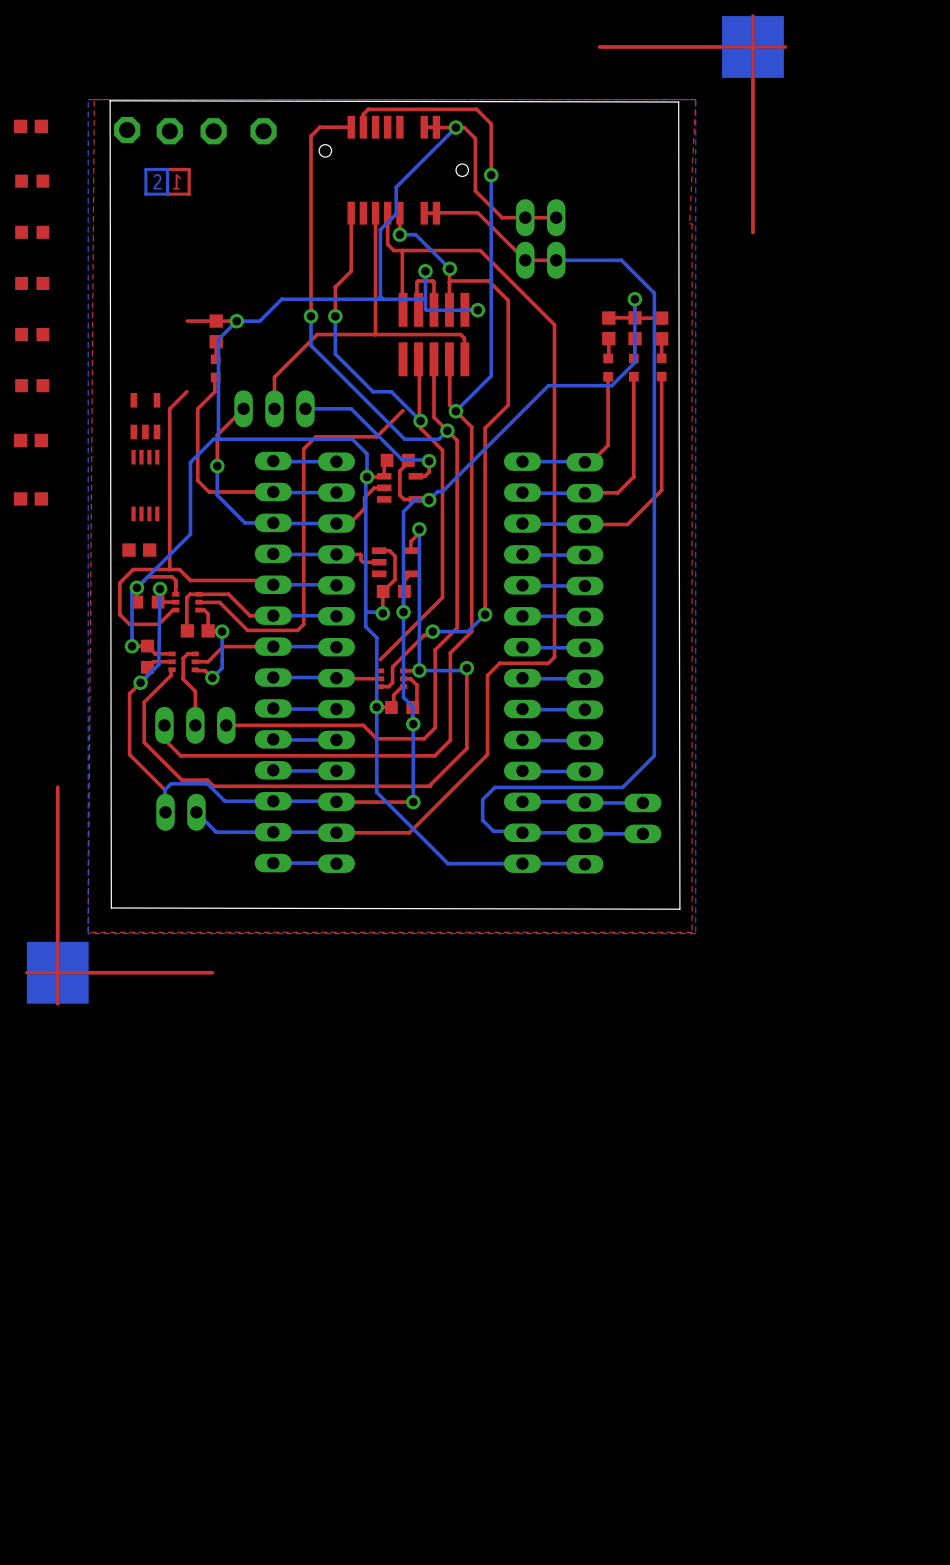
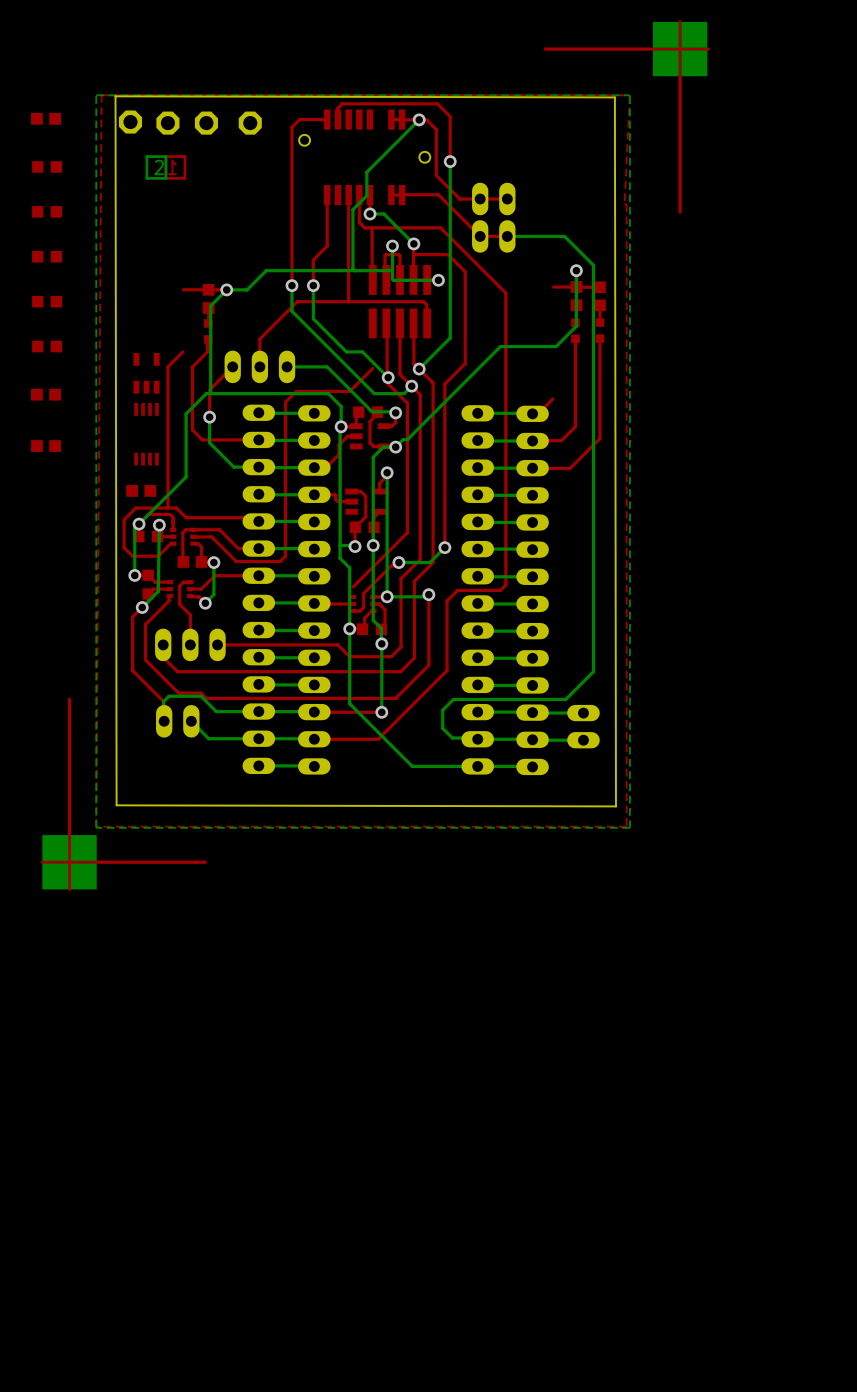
part: (608, 328) -> none
top track: (608, 338) (608, 358) -> none
part: (608, 367) -> none
top track: (608, 376) (608, 445) -> none

